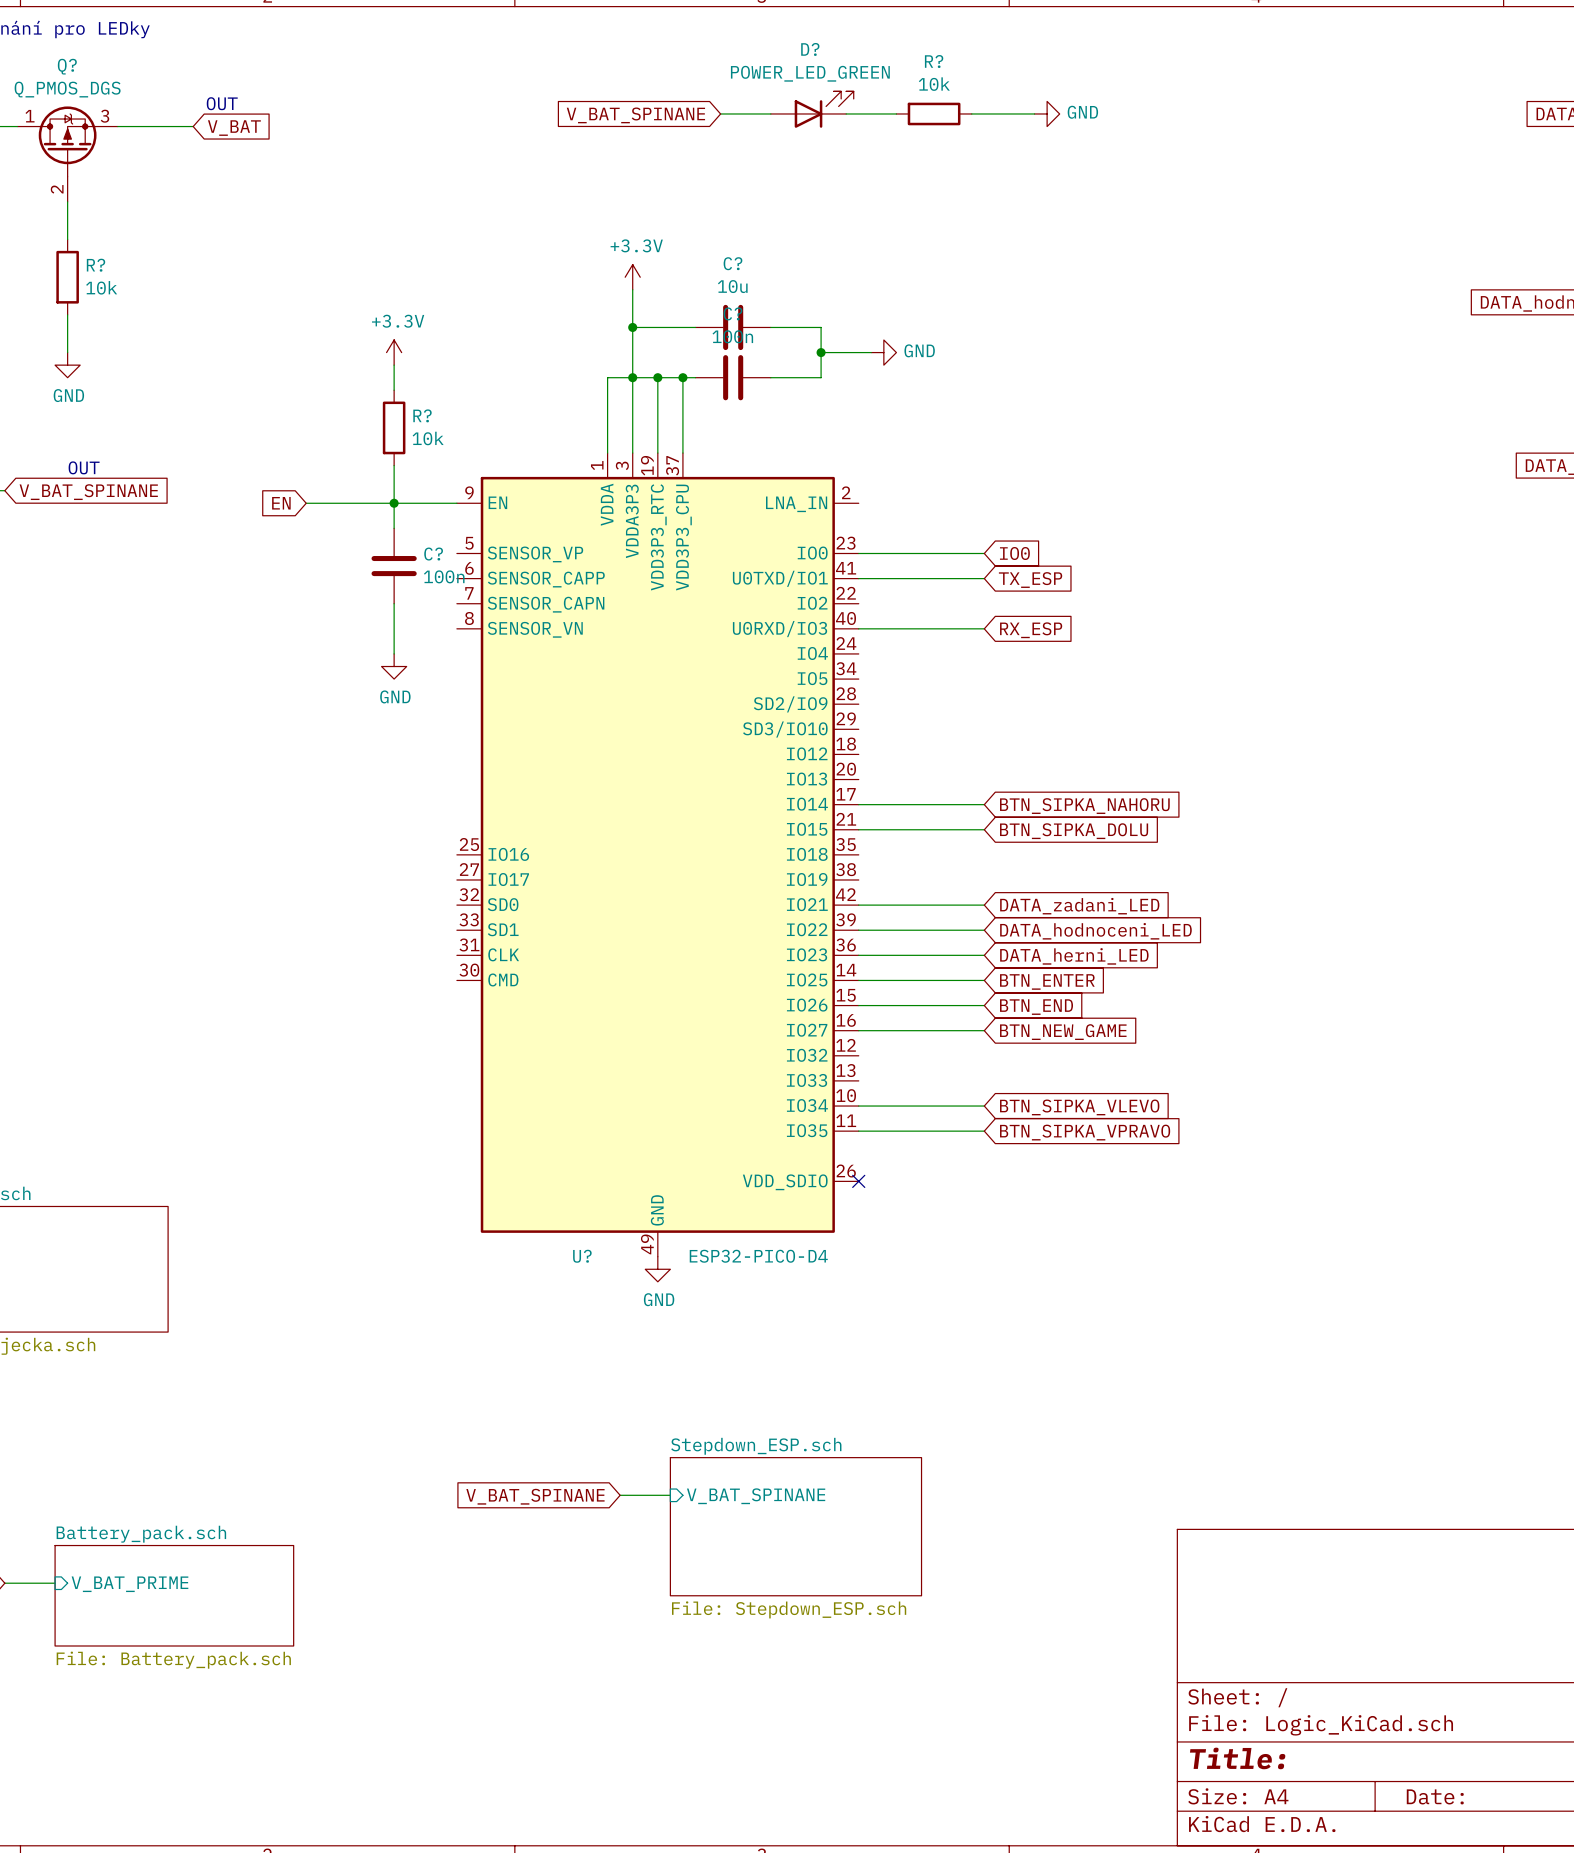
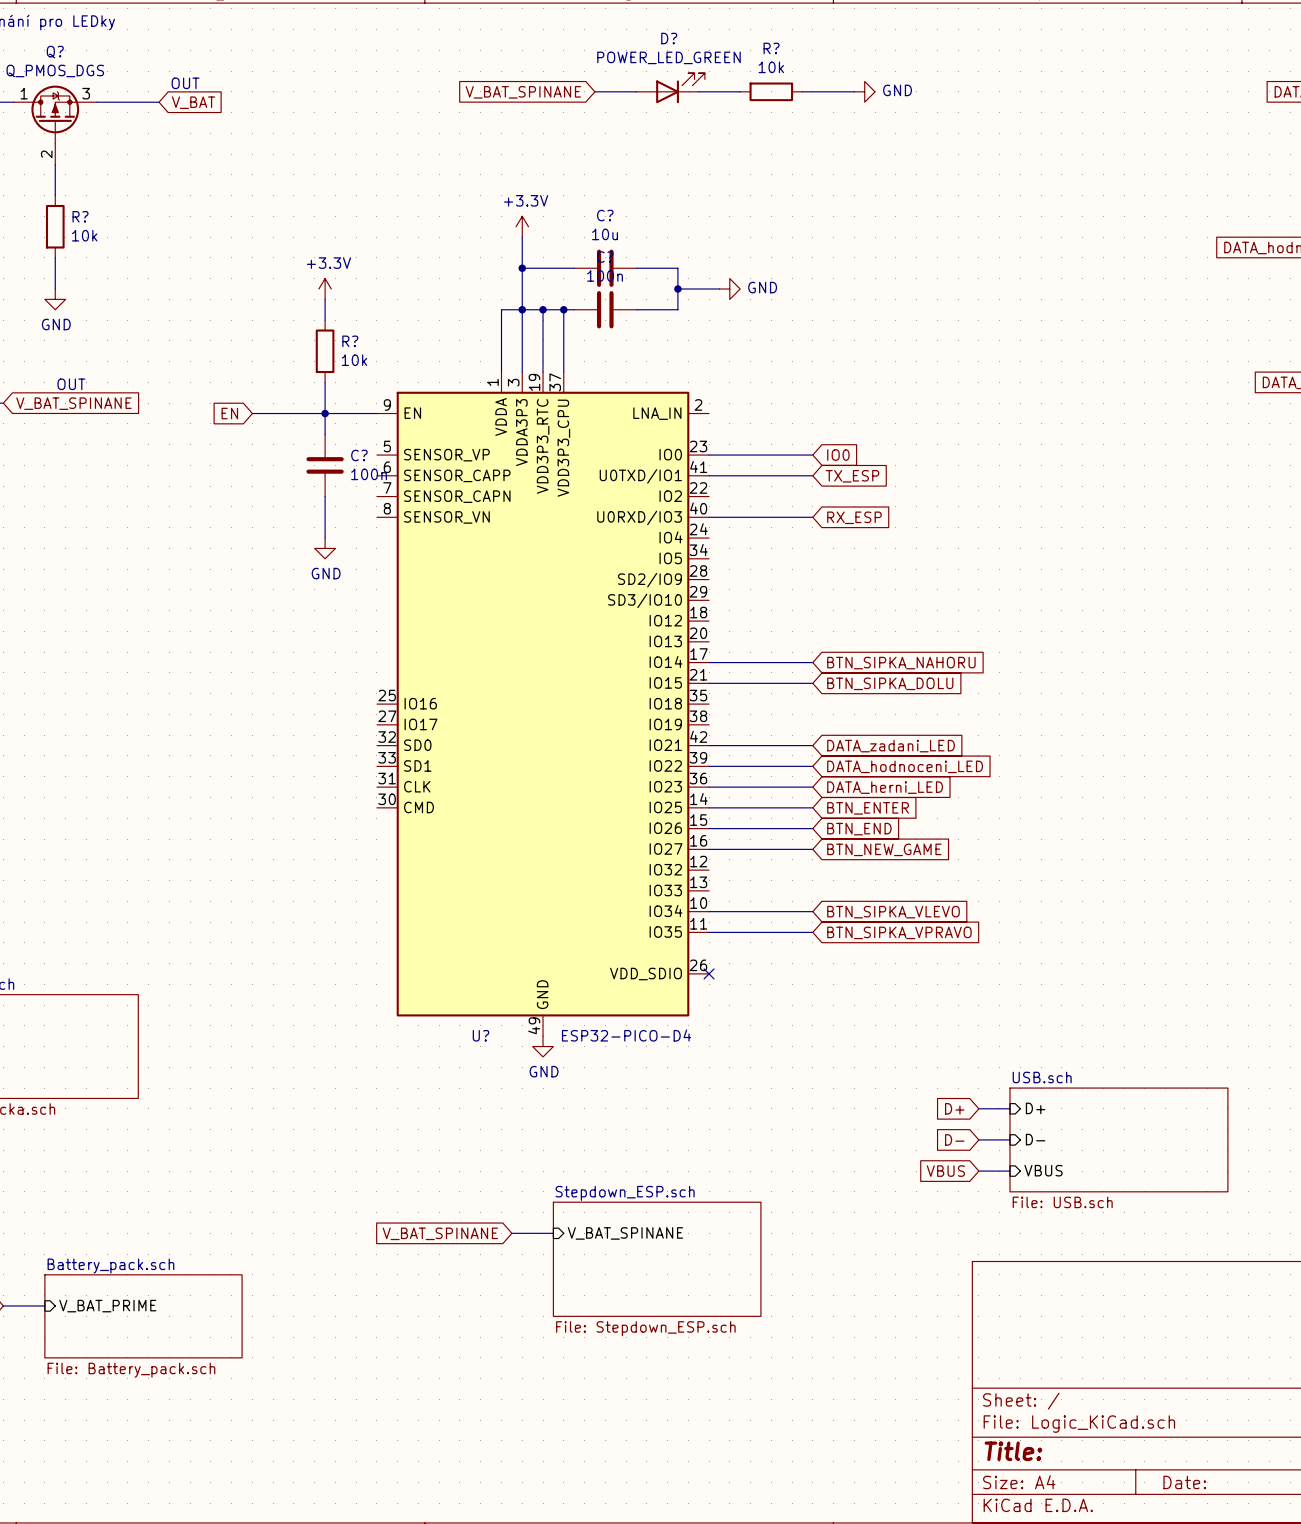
global label: none -> D+ (954, 1108)
wire: none -> (978, 1108) (1009, 1108)
sheet pin: none -> D+ (1035, 1108)
sheet pin: none -> D- (1035, 1139)
global label: none -> D- (954, 1139)
wire: none -> (978, 1139) (1009, 1139)
sheet USB.sch: none -> File: USB.sch (1118, 1139)
global label: none -> VBUS (945, 1171)
wire: none -> (978, 1171) (1009, 1171)
sheet pin: none -> VBUS (1043, 1170)

